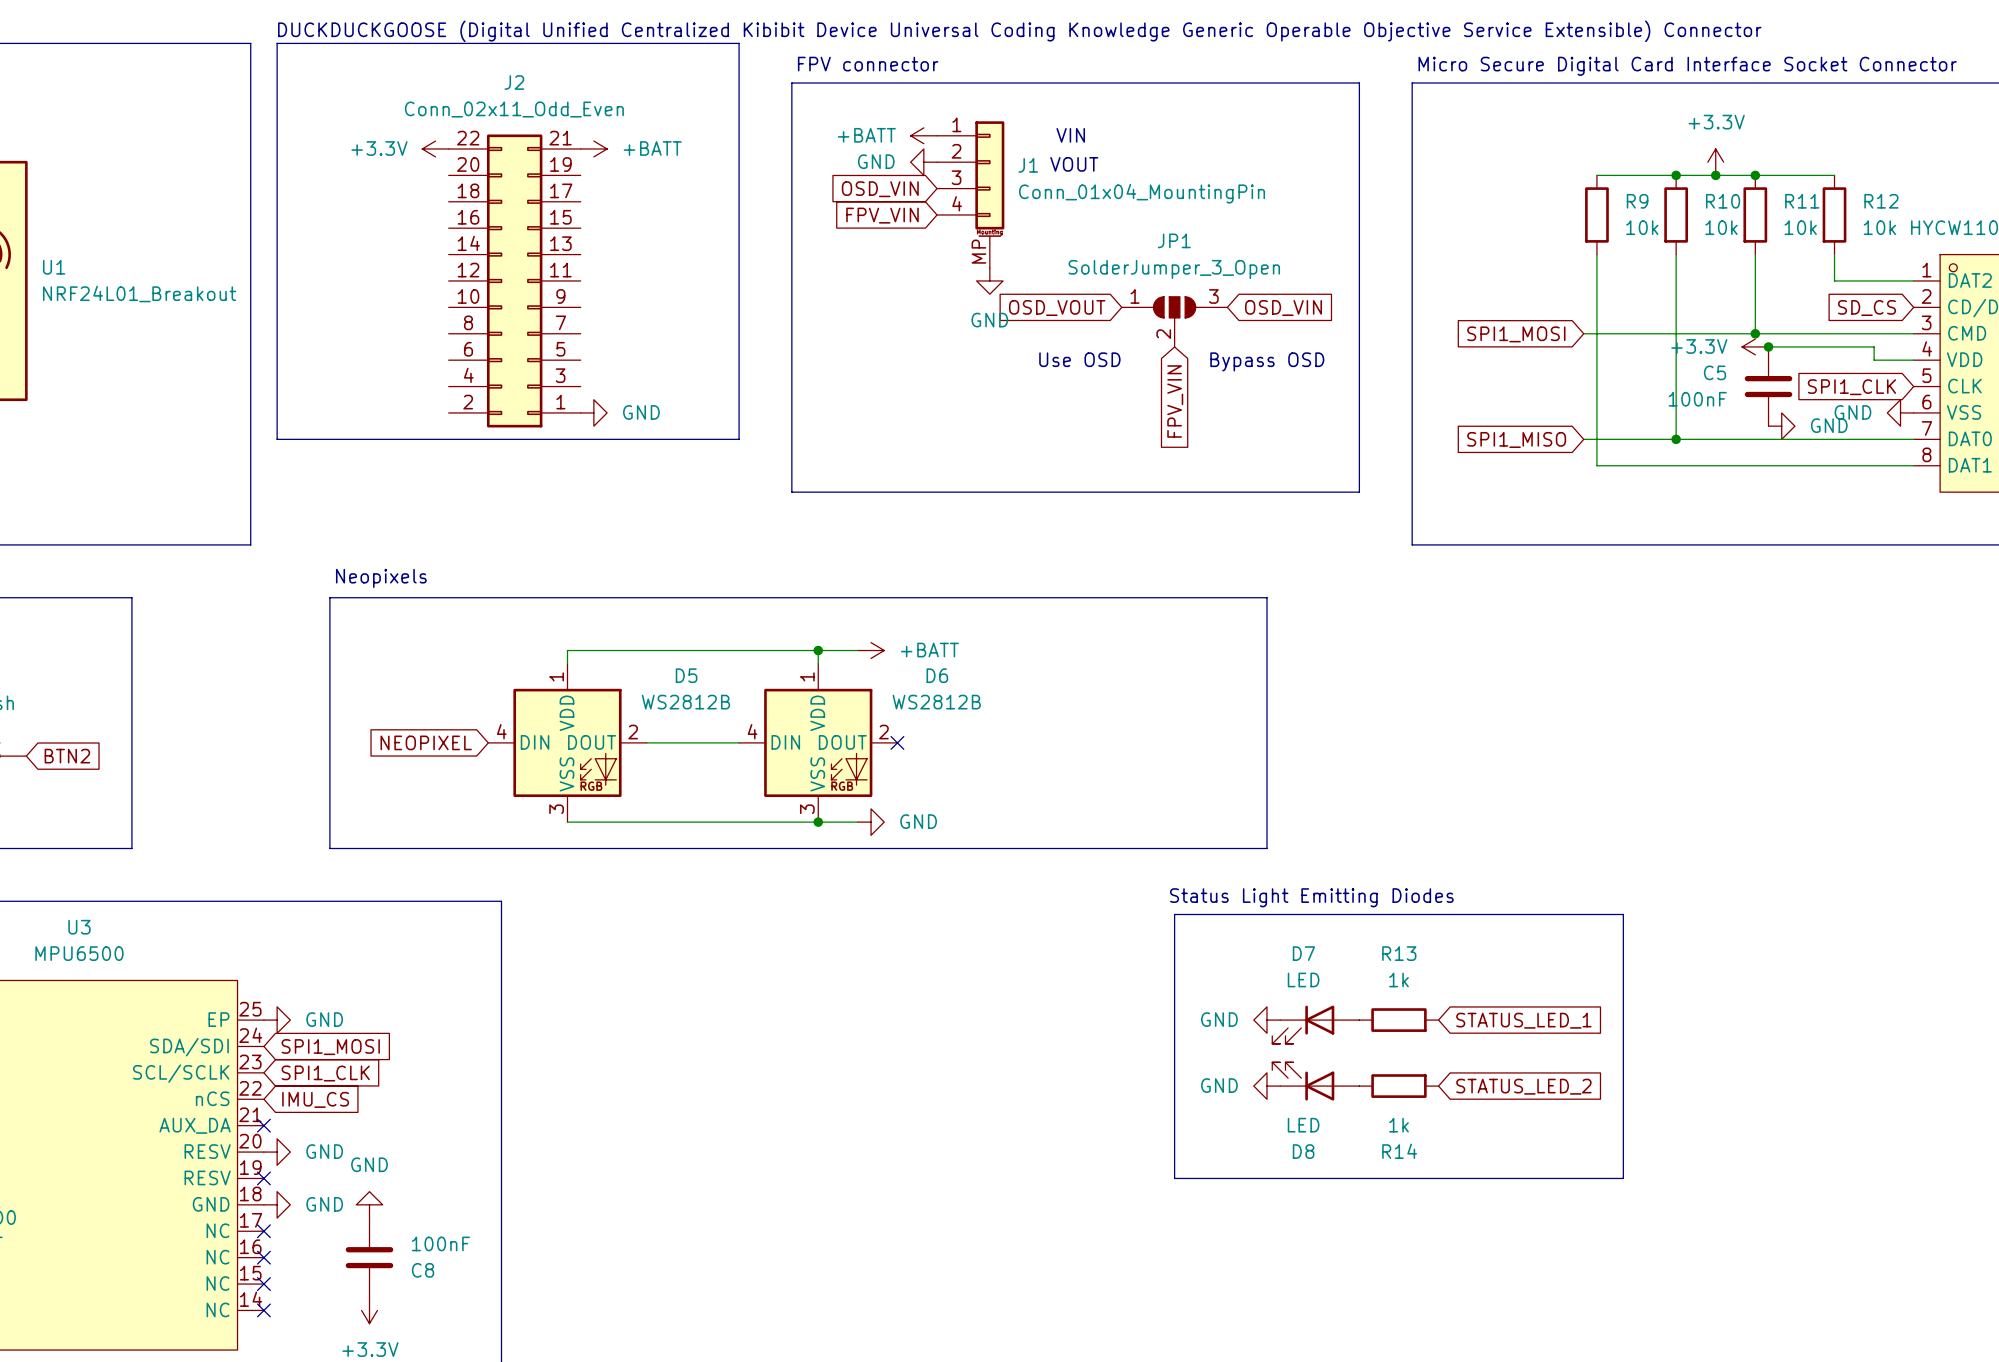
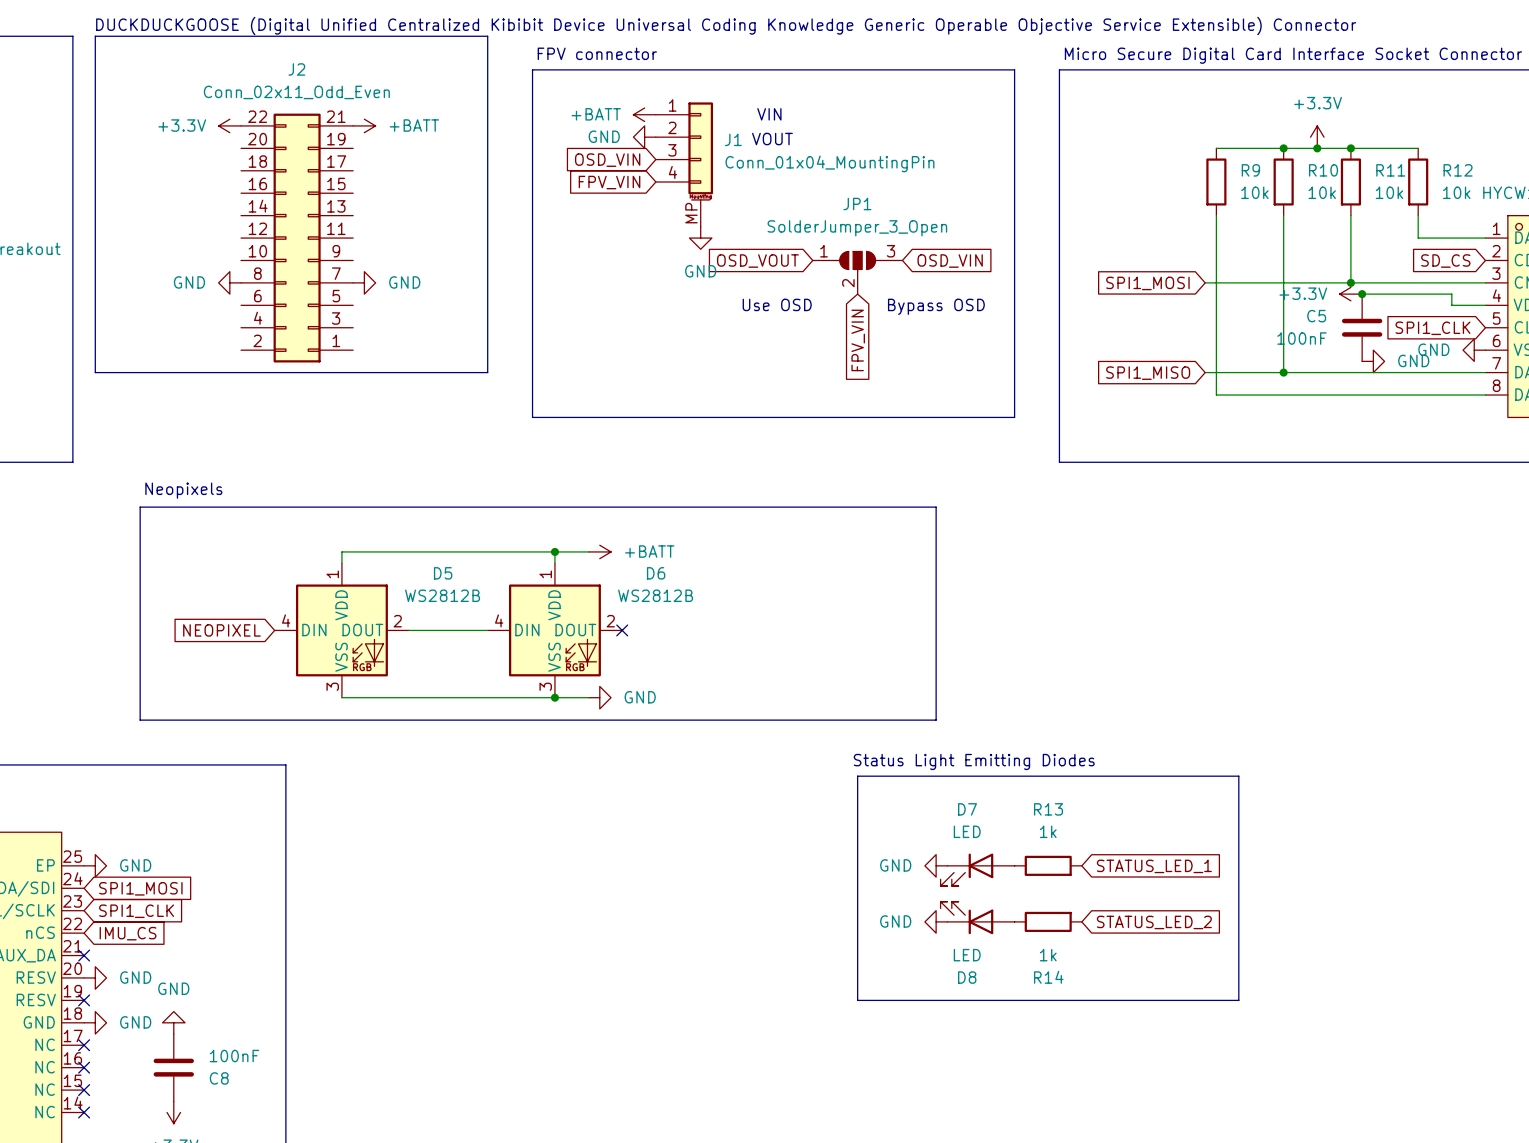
power symbol: none -> GND (229, 282)
power symbol position: GND (593, 412) -> GND (364, 282)

